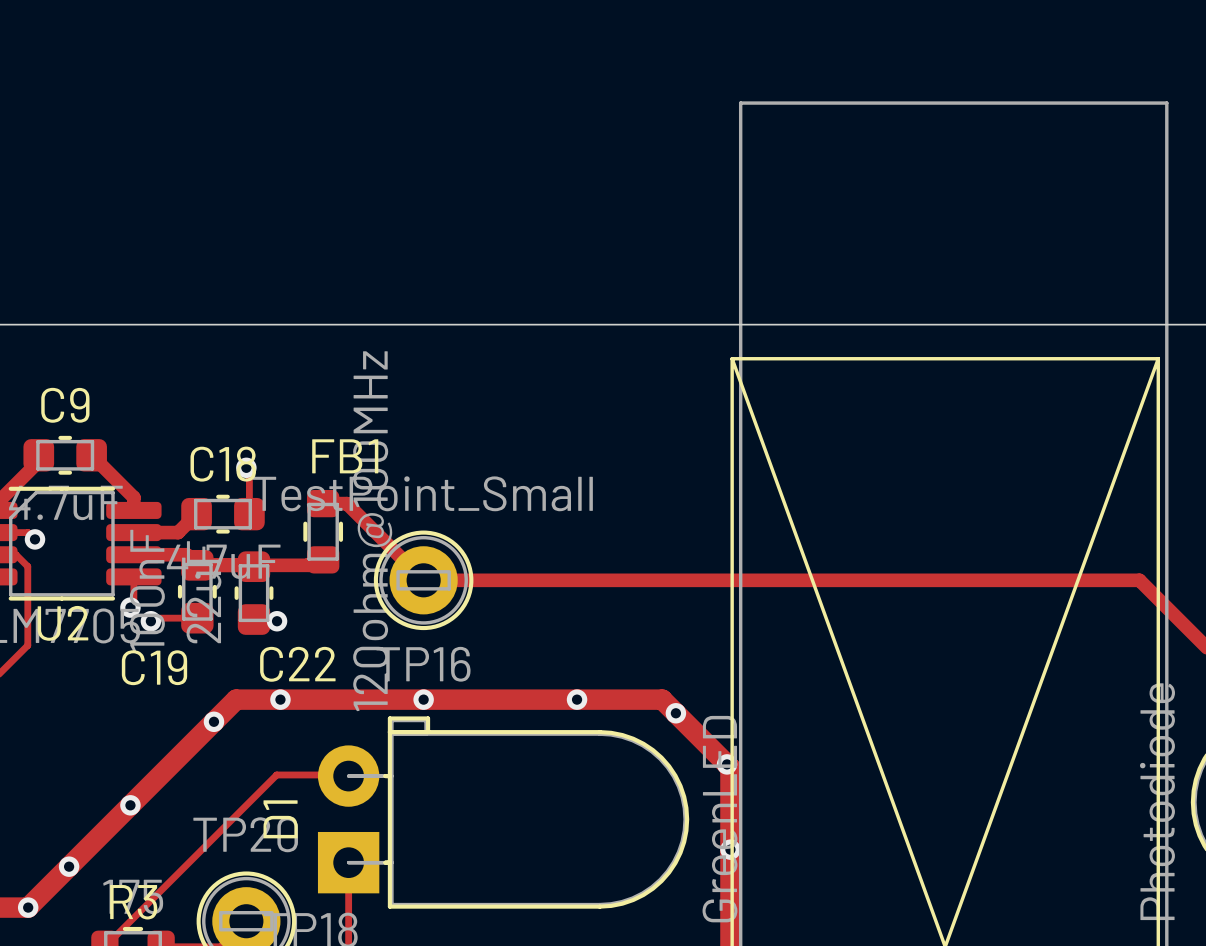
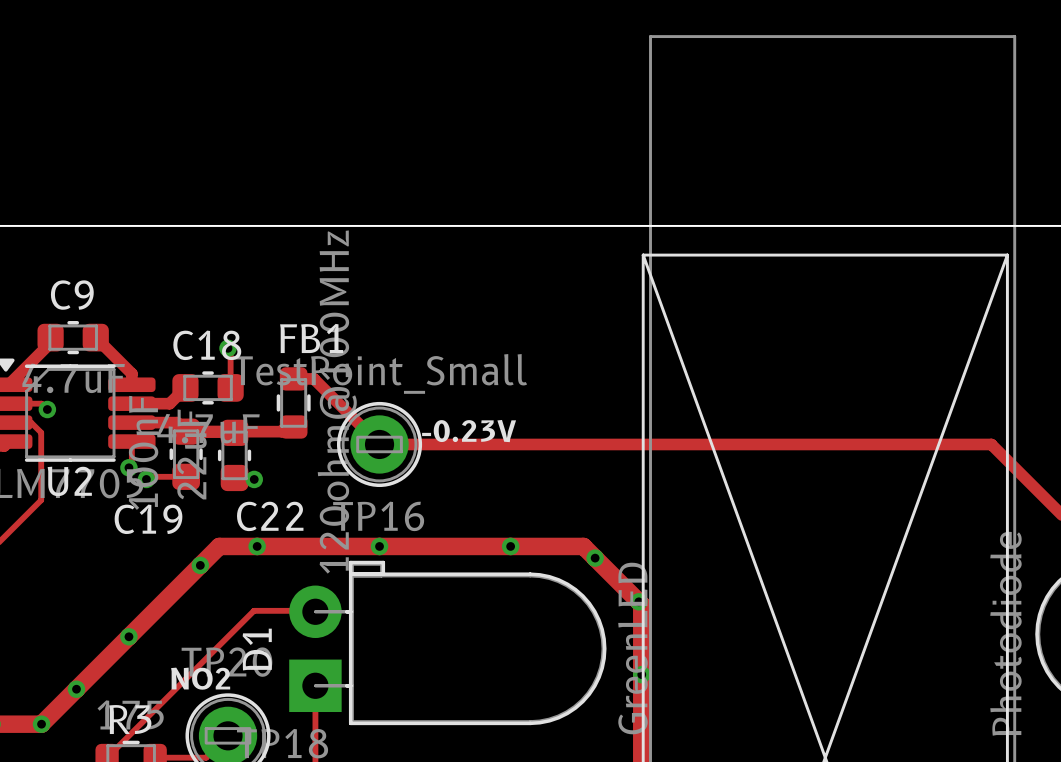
text: none -> -0.23V (469, 431)
text: none -> NO2 (200, 678)

